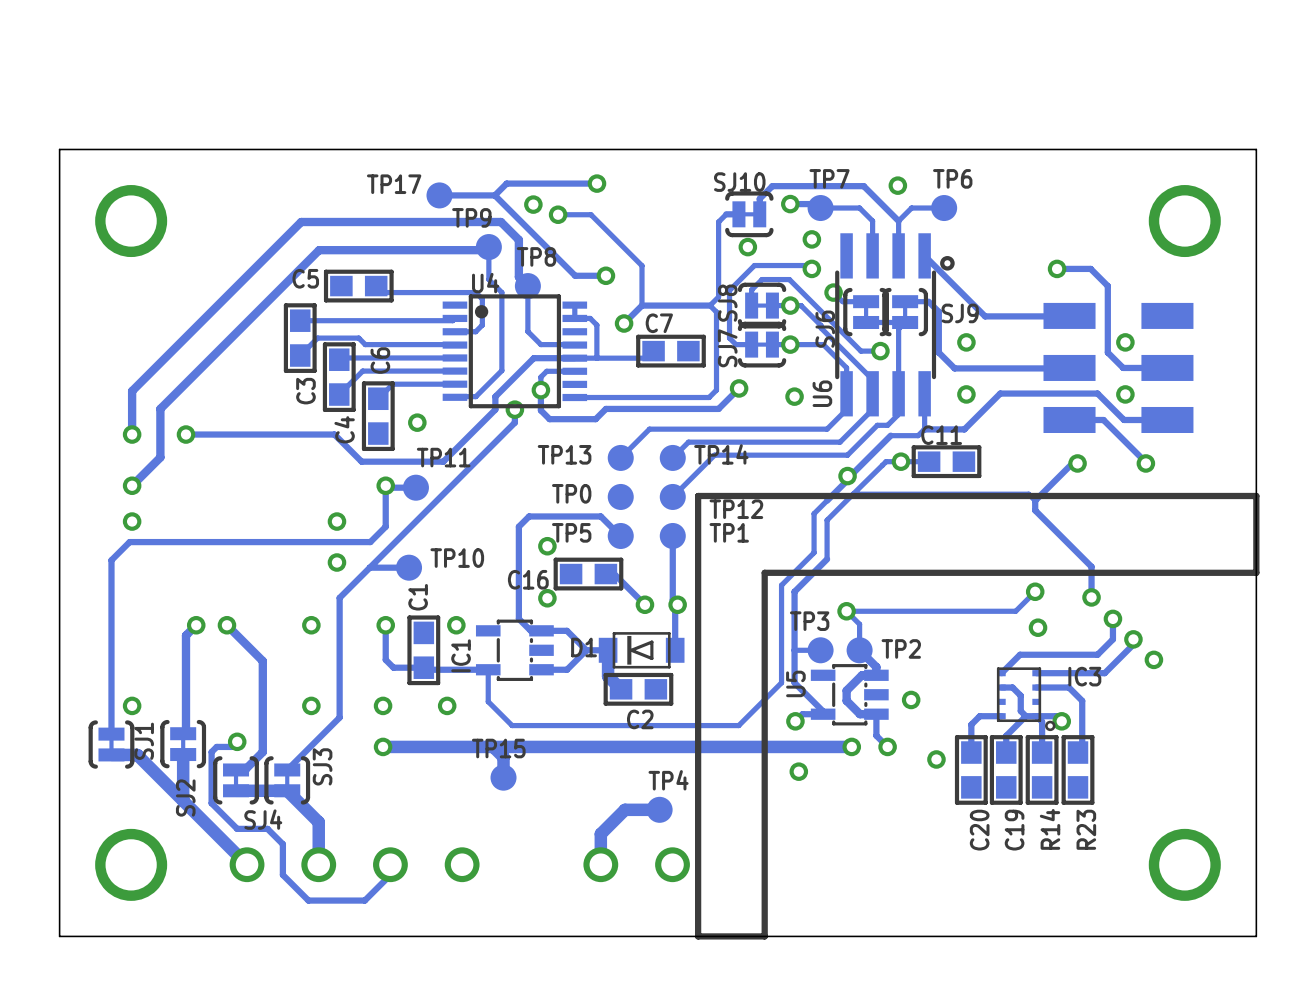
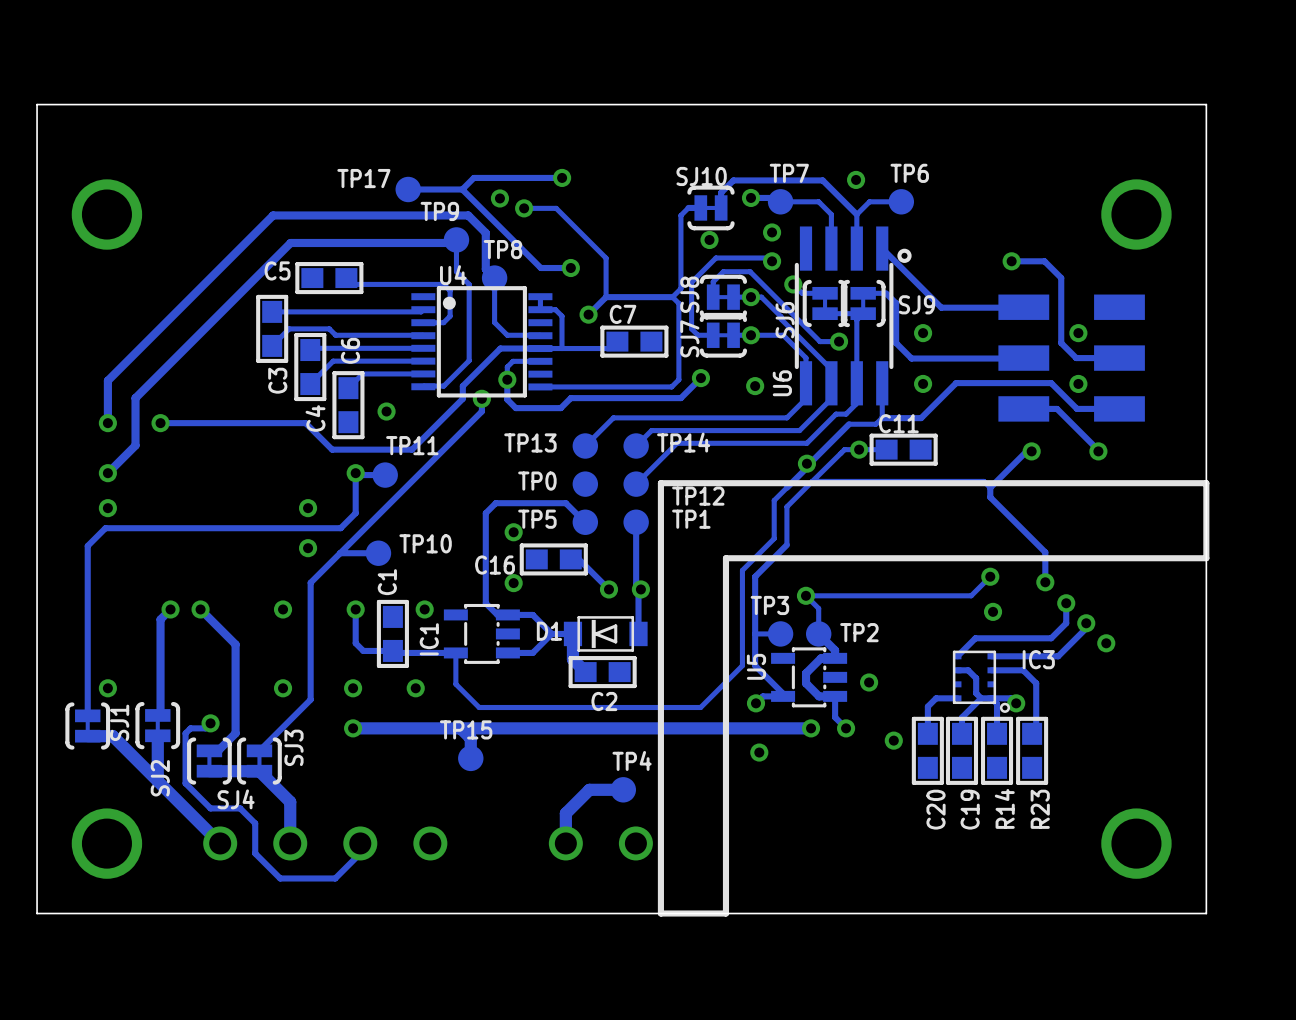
board edge: (1256, 149) (59, 149) -> (1206, 144) (1206, 104) (37, 104) (37, 144)

